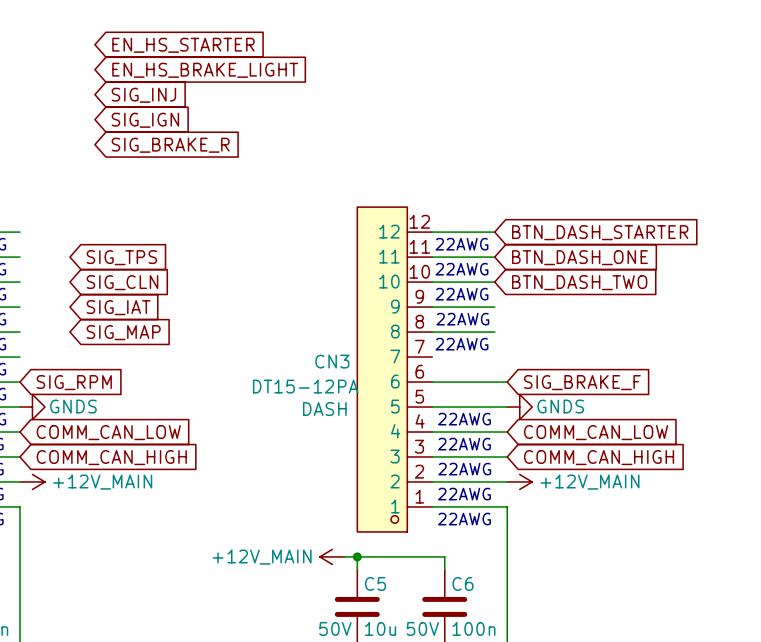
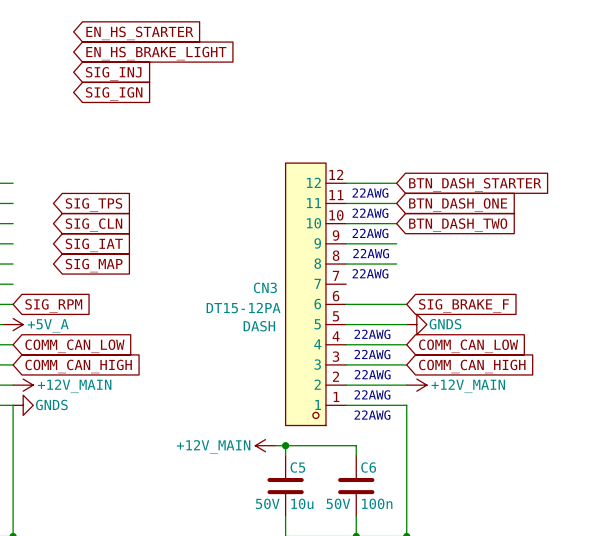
global label: SIG_BRAKE_R (170, 145) -> none
power symbol: none -> +5V_A (13, 324)
power symbol position: GNDS (32, 407) -> GNDS (23, 405)

